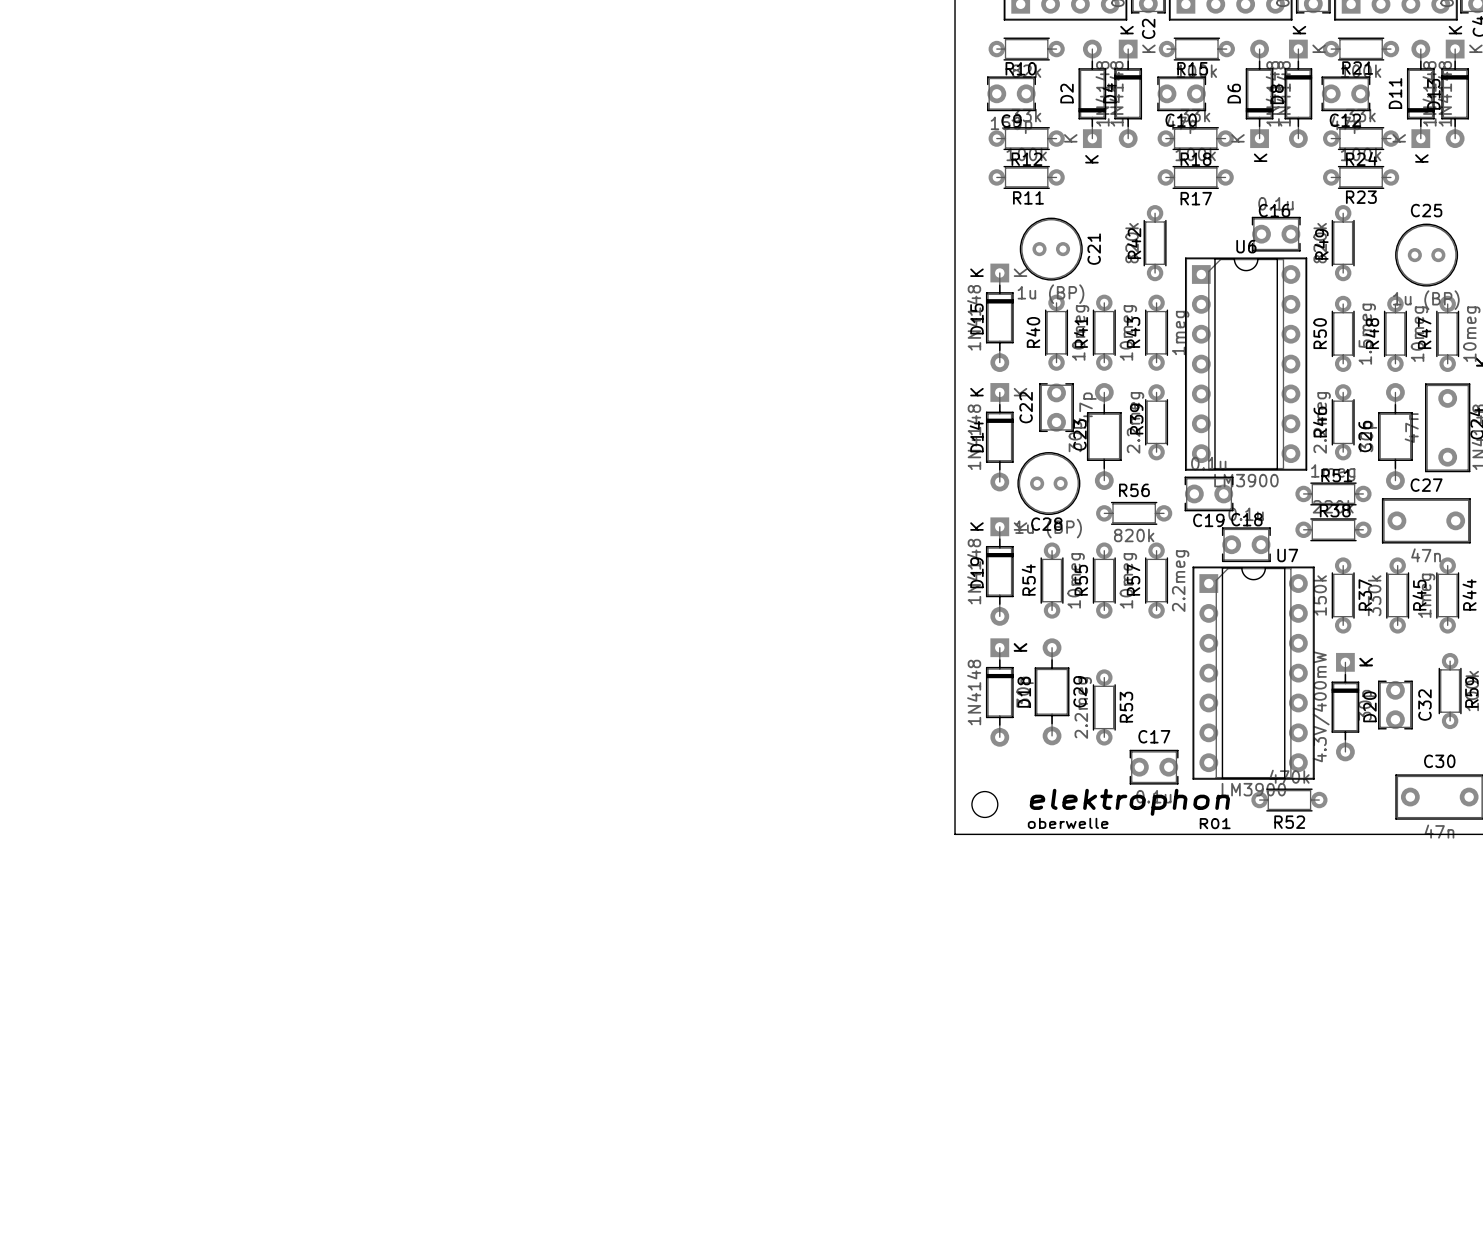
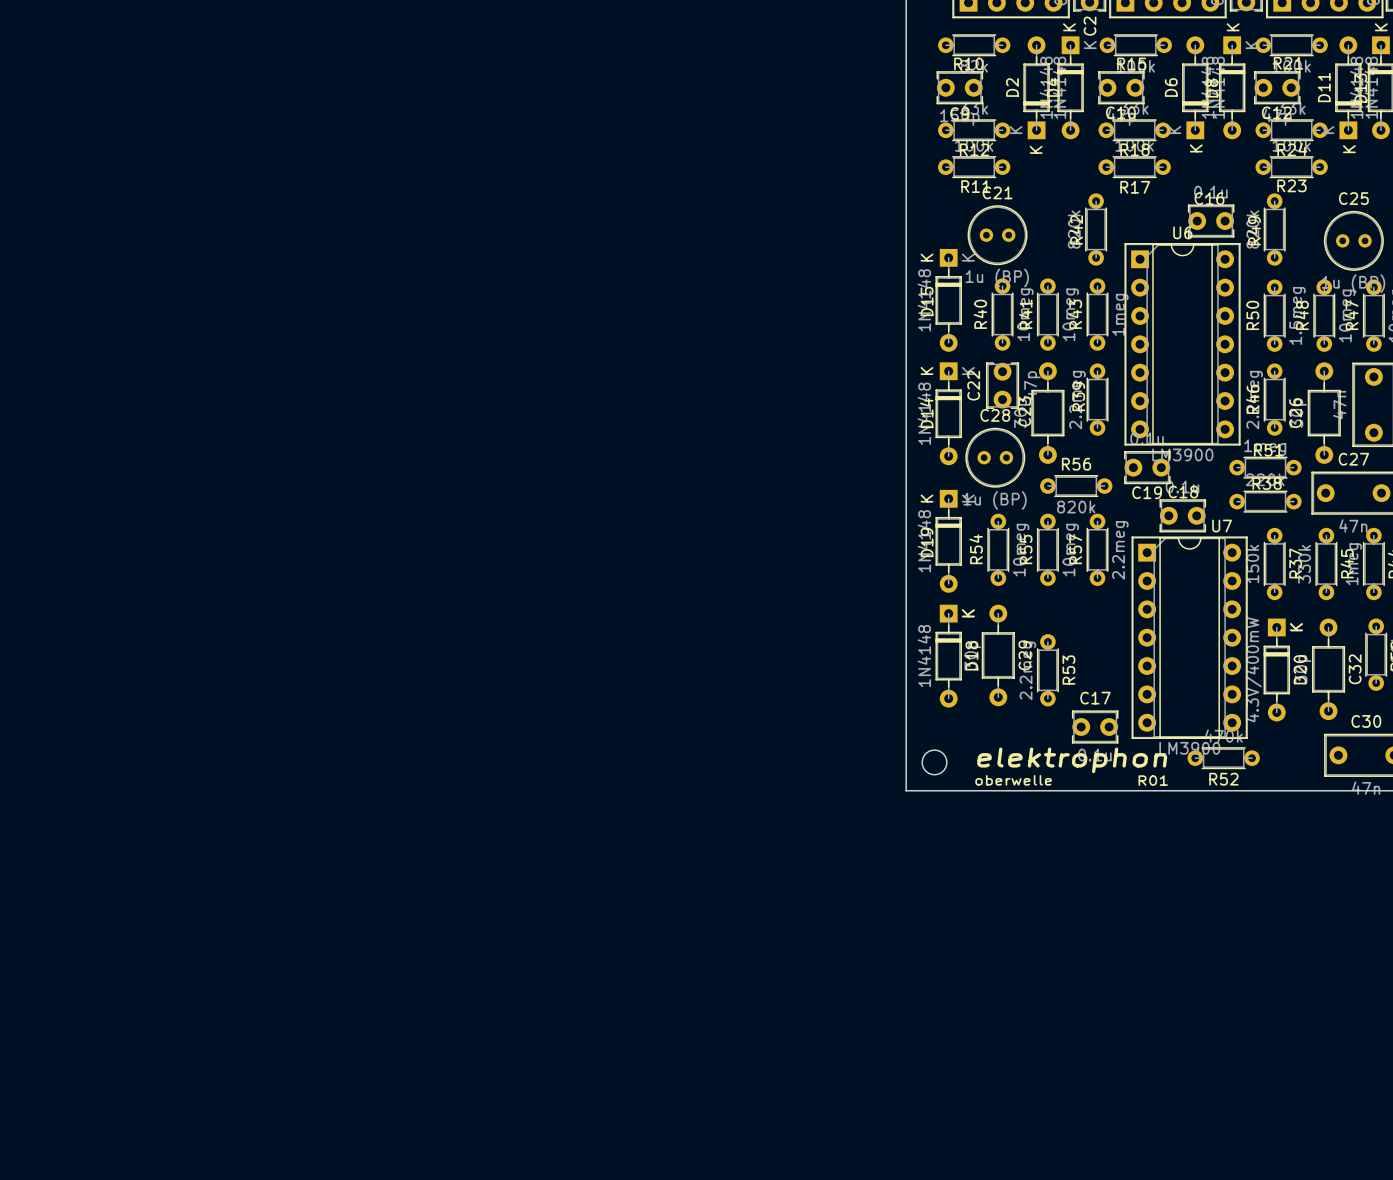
C21 name rotation: 0° (1094, 249) -> 90° clockwise (997, 192)
C21 name position: C21 (1094, 249) -> C21 (997, 192)
C28 name position: C28 (1046, 524) -> C28 (995, 415)
C32 footprint: [1378, 680, 1413, 730] -> [1312, 618, 1346, 721]

